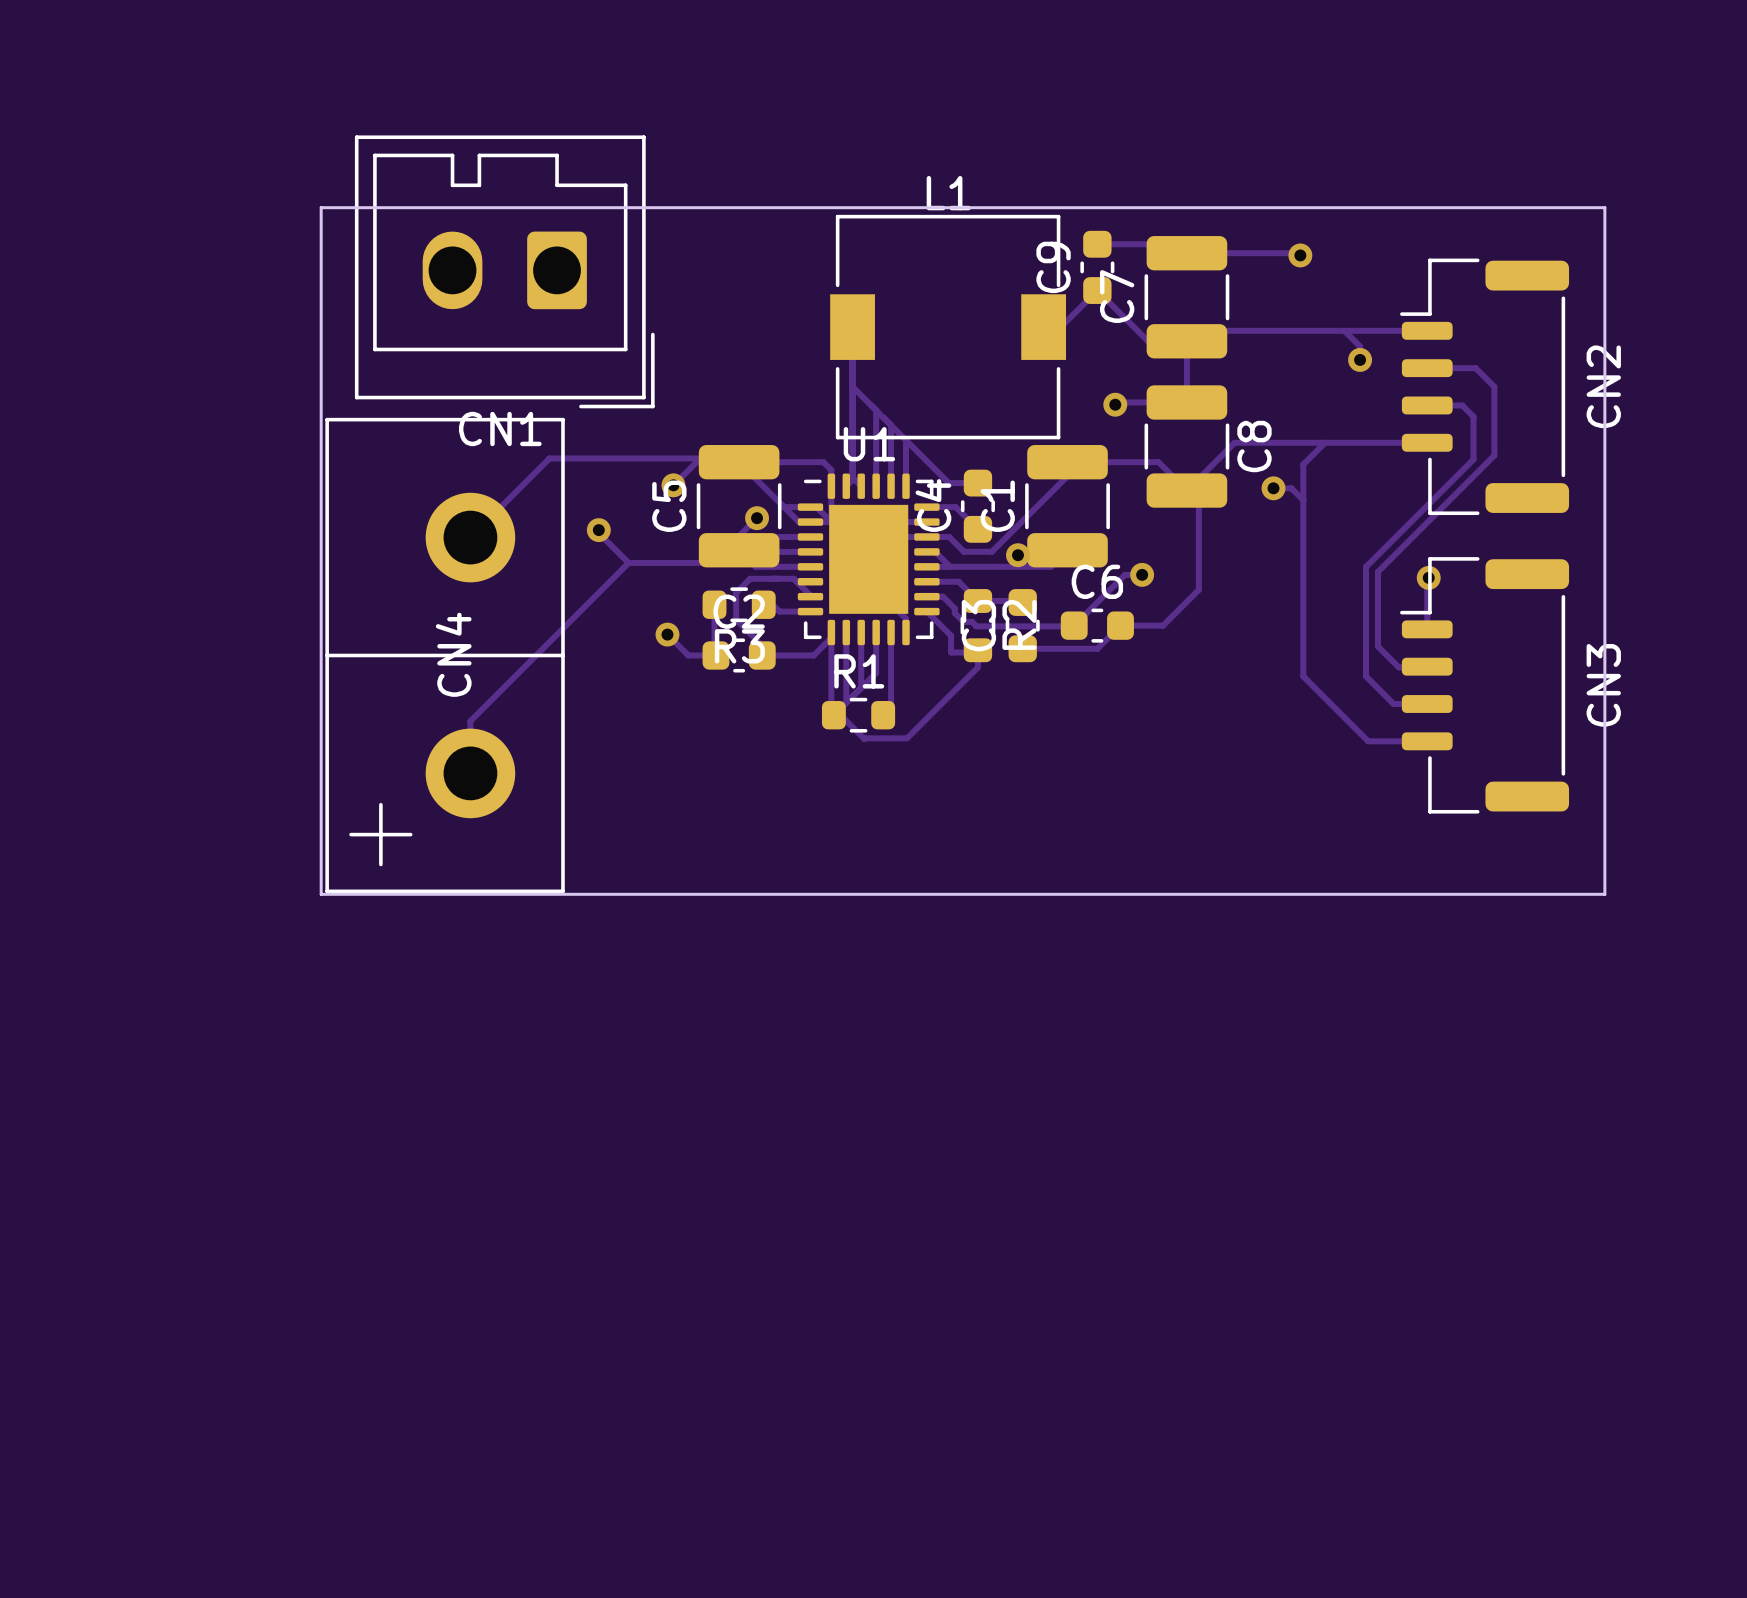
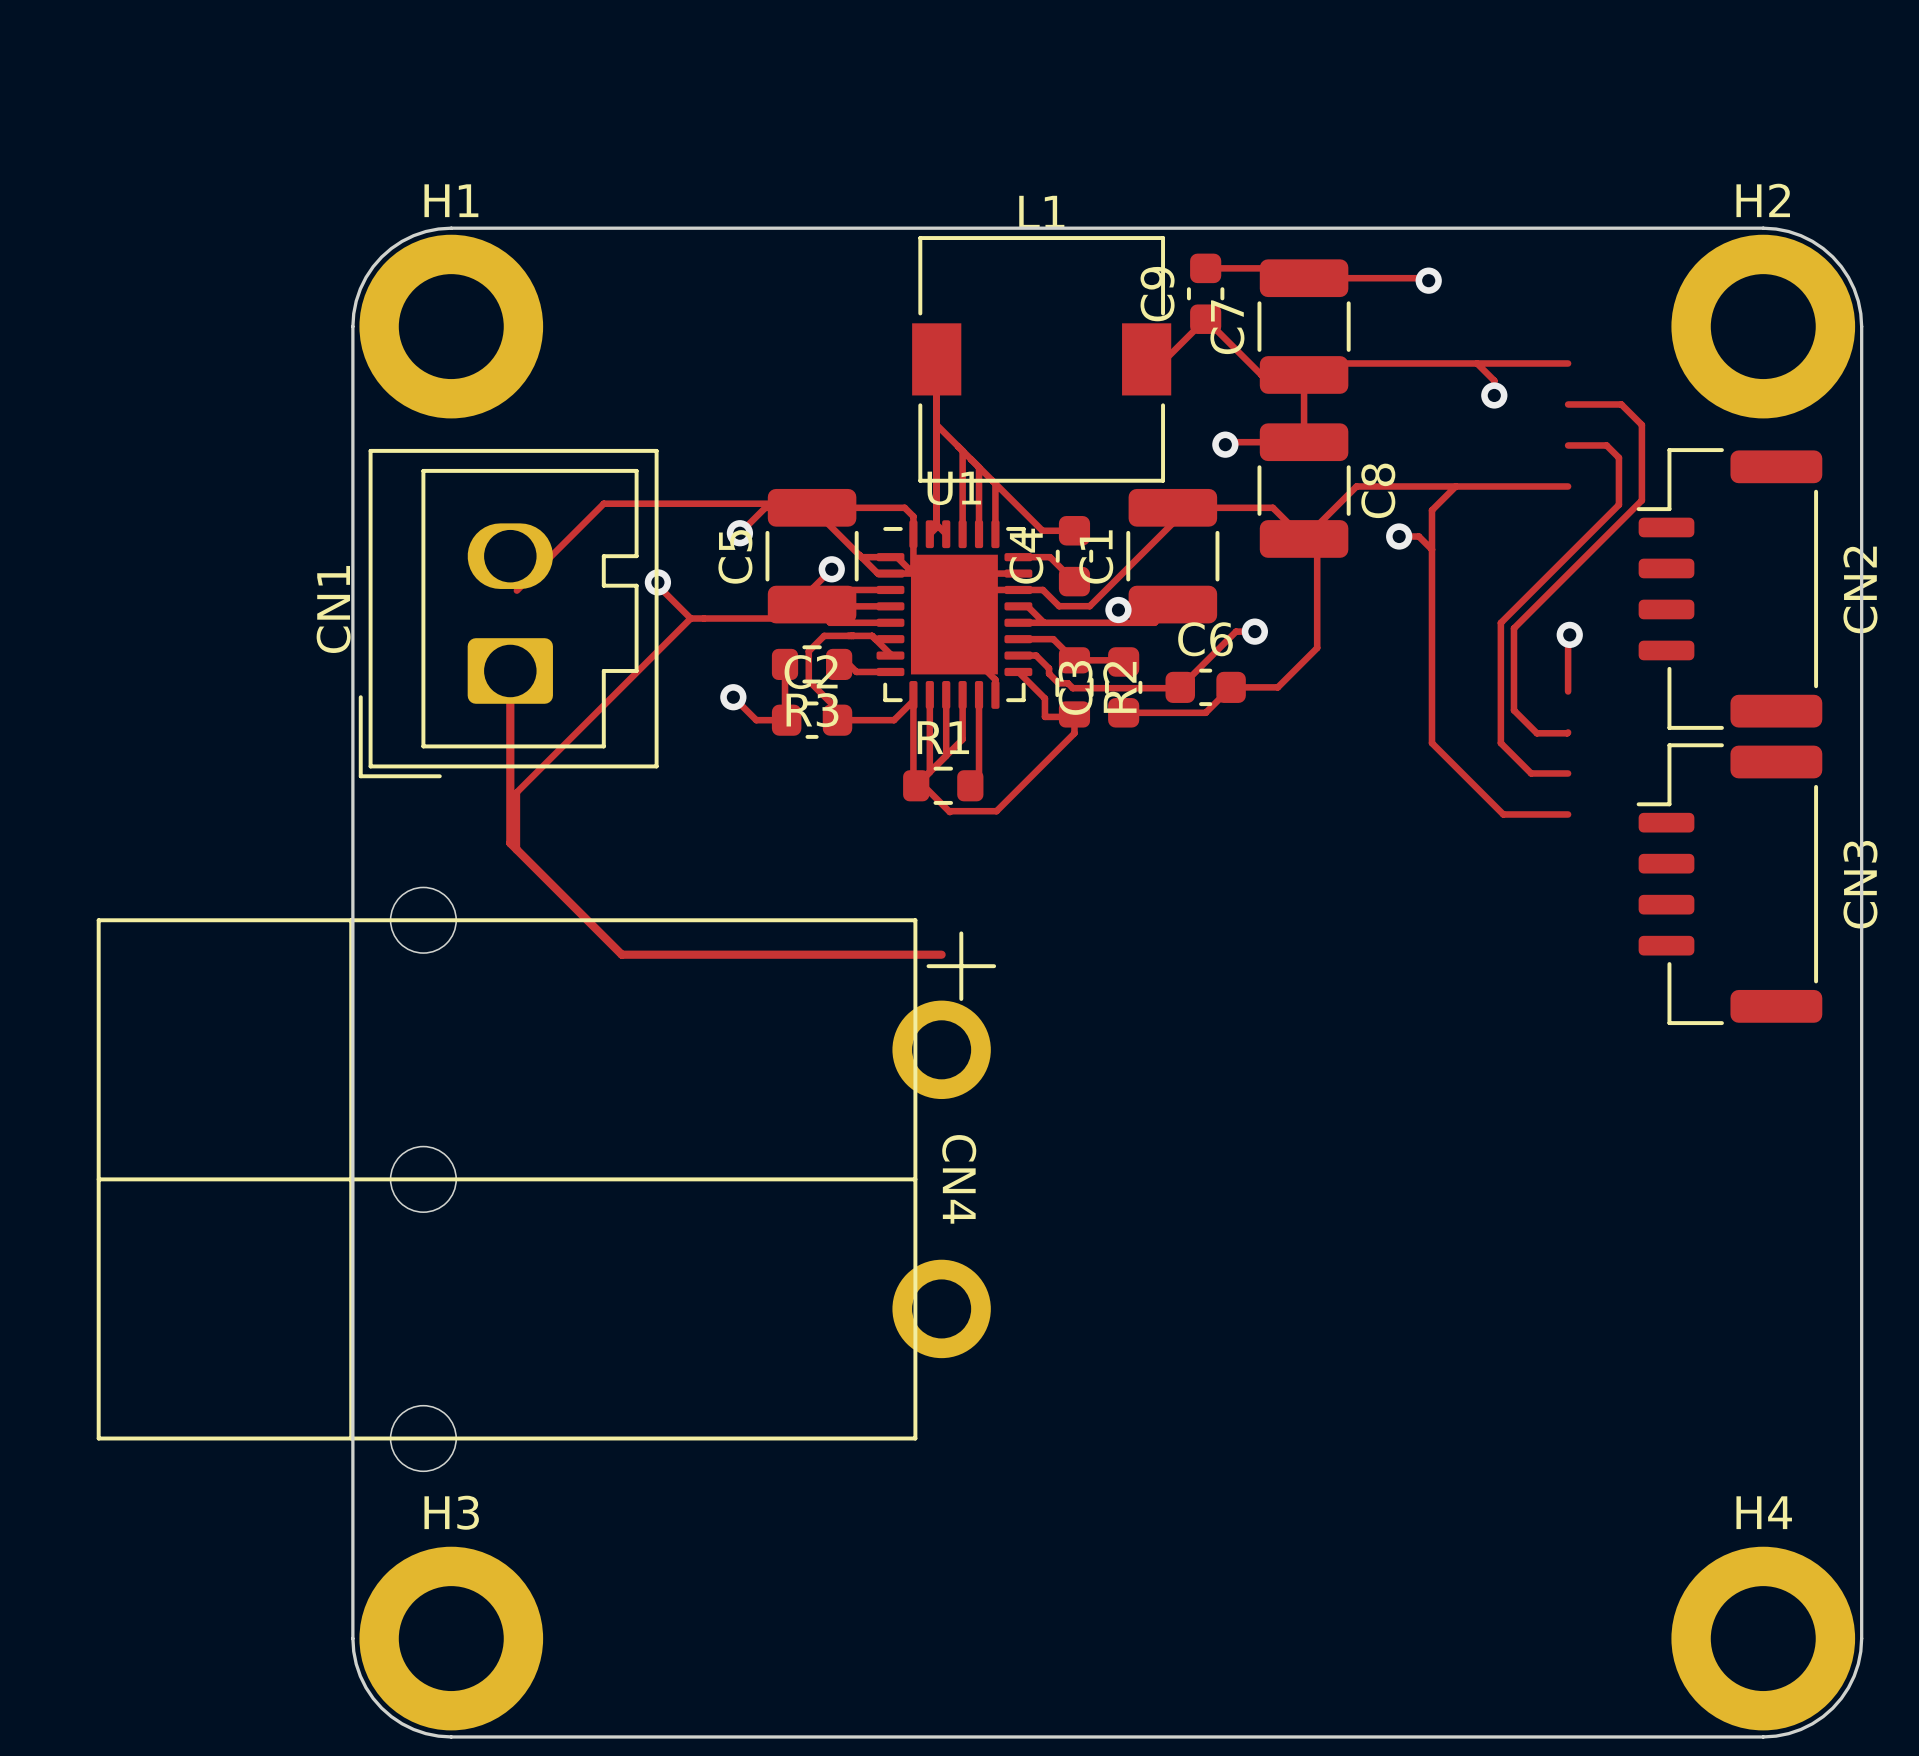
board edge: (410, 207) (321, 207) (321, 297) -> (451, 228) (438, 229) (413, 235) (391, 248) (381, 257) (366, 277) (360, 288) (353, 313) (352, 326)
board edge: (1604, 207) (1604, 894) (321, 894) -> (1763, 228) (1776, 229) (1800, 235) (1823, 248) (1832, 257) (1848, 277) (1854, 288) (1860, 313) (1861, 326) (1861, 1638) (1858, 1664) (1848, 1687) (1832, 1708) (1812, 1723) (1788, 1733) (1763, 1736) (451, 1736) (425, 1733) (402, 1723) (381, 1708) (366, 1687) (360, 1676) (353, 1651) (352, 982)
CN1 rotation: 0° (504, 271) -> 90° clockwise (508, 613)
CN1 position: (504, 271) -> (508, 613)
H1: none -> (451, 326)
H2: none -> (1763, 326)
CN2 position: (1484, 386) -> (1729, 588)
CN4 footprint: [325, 417, 565, 894] -> [96, 887, 997, 1472]
track: none -> (510, 670) (510, 843) (621, 954) (941, 954)
CN4 name position: CN4 (453, 654) -> CN4 (959, 1179)
CN3 position: (1484, 685) -> (1729, 884)
H3: none -> (451, 1638)
H4: none -> (1763, 1638)

